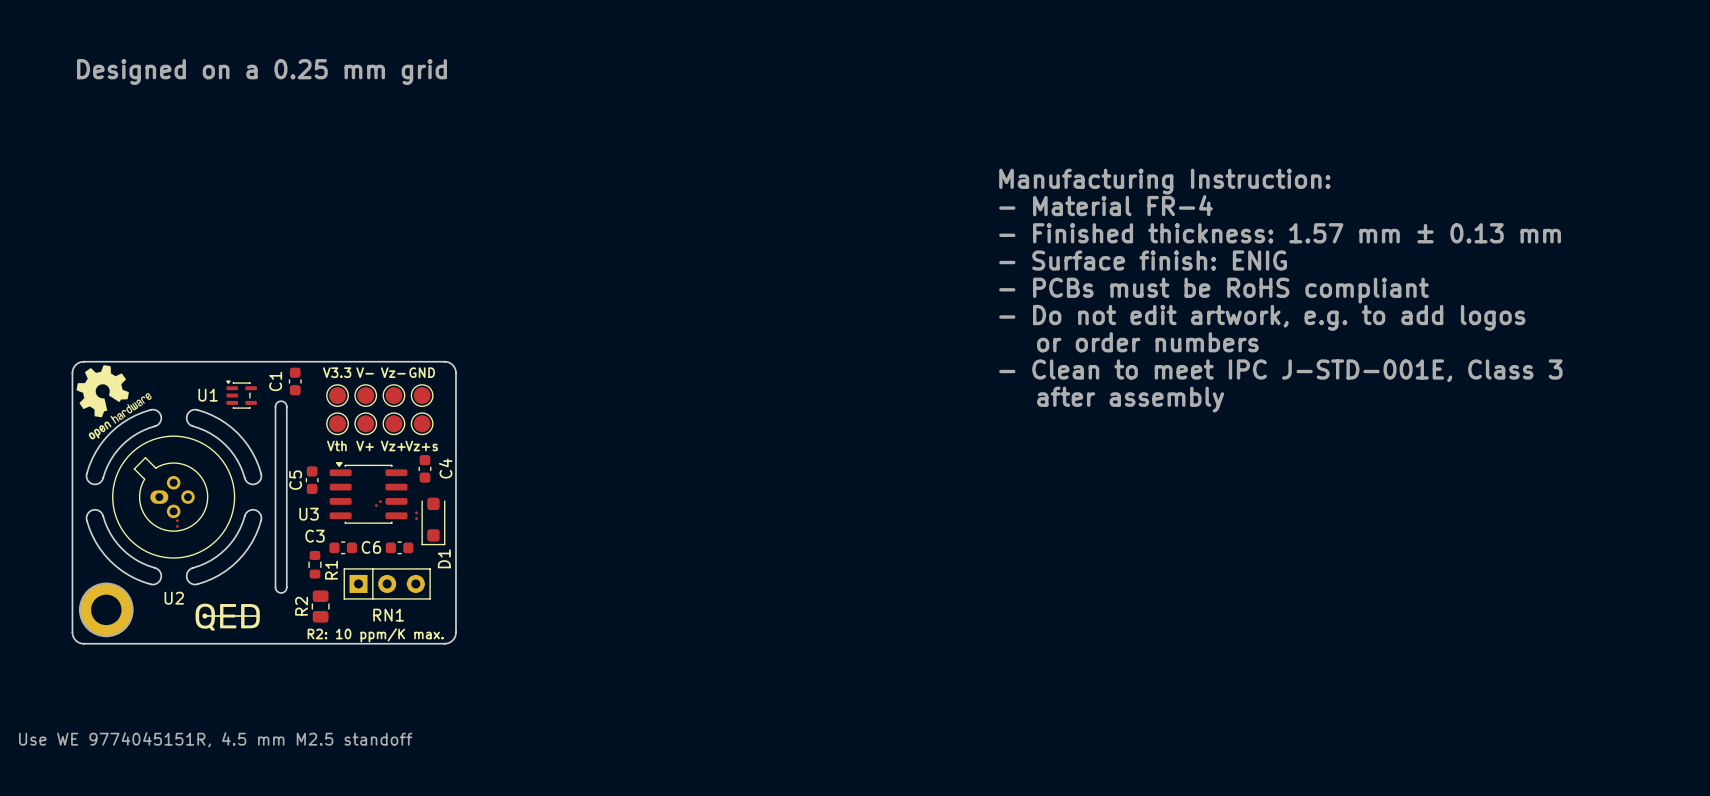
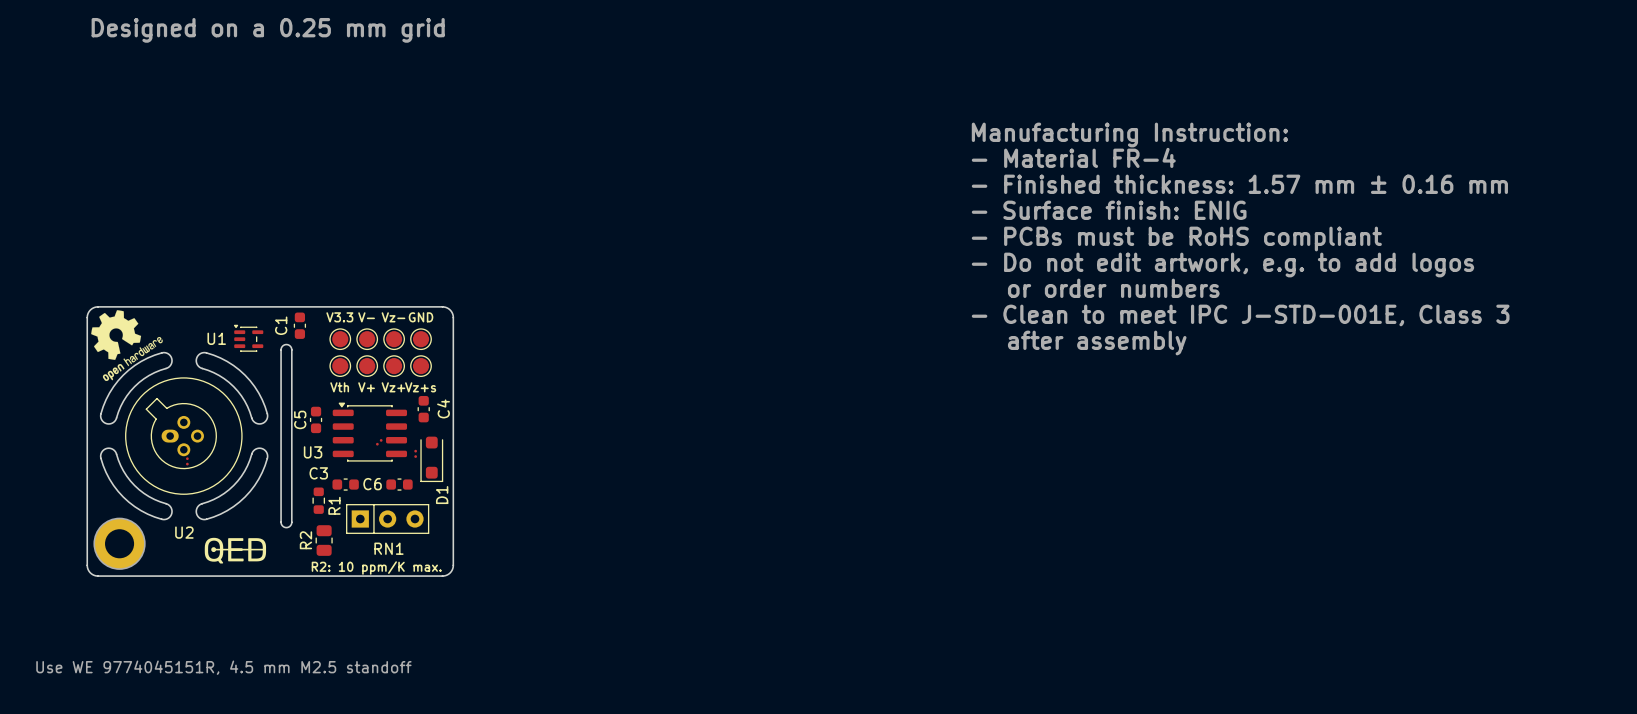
text: - Finished thickness: 1.57 mm ± 0.13 mm (1280, 233) -> - Finished thickness: 1.57 mm ± 0.16 mm (1239, 184)

